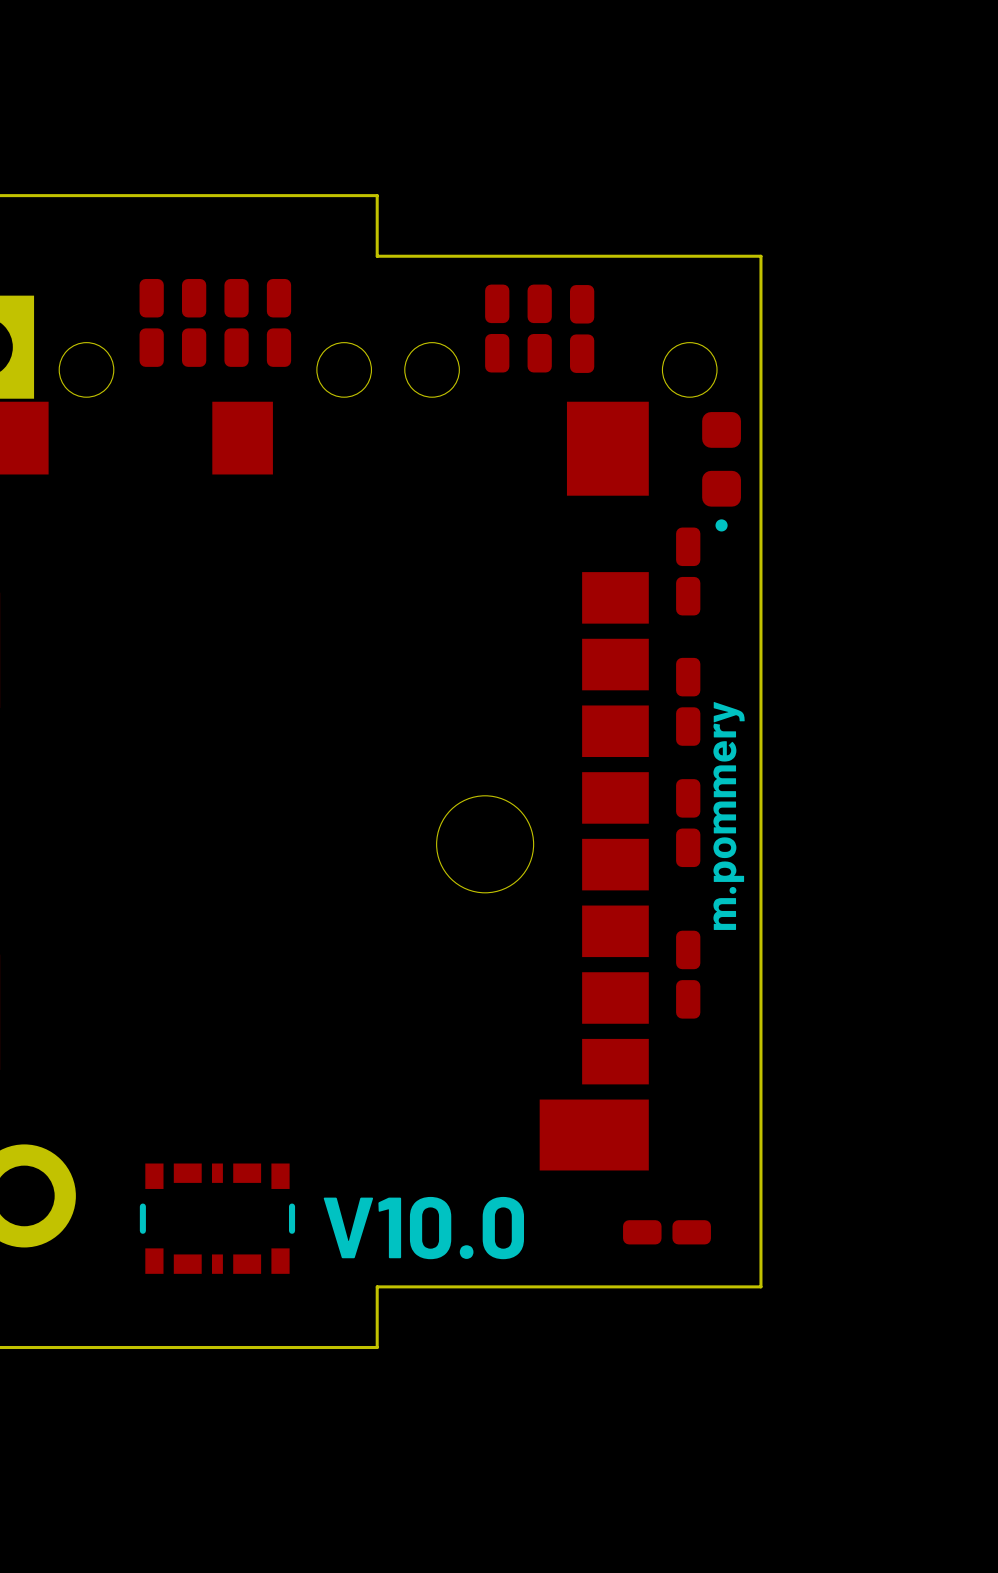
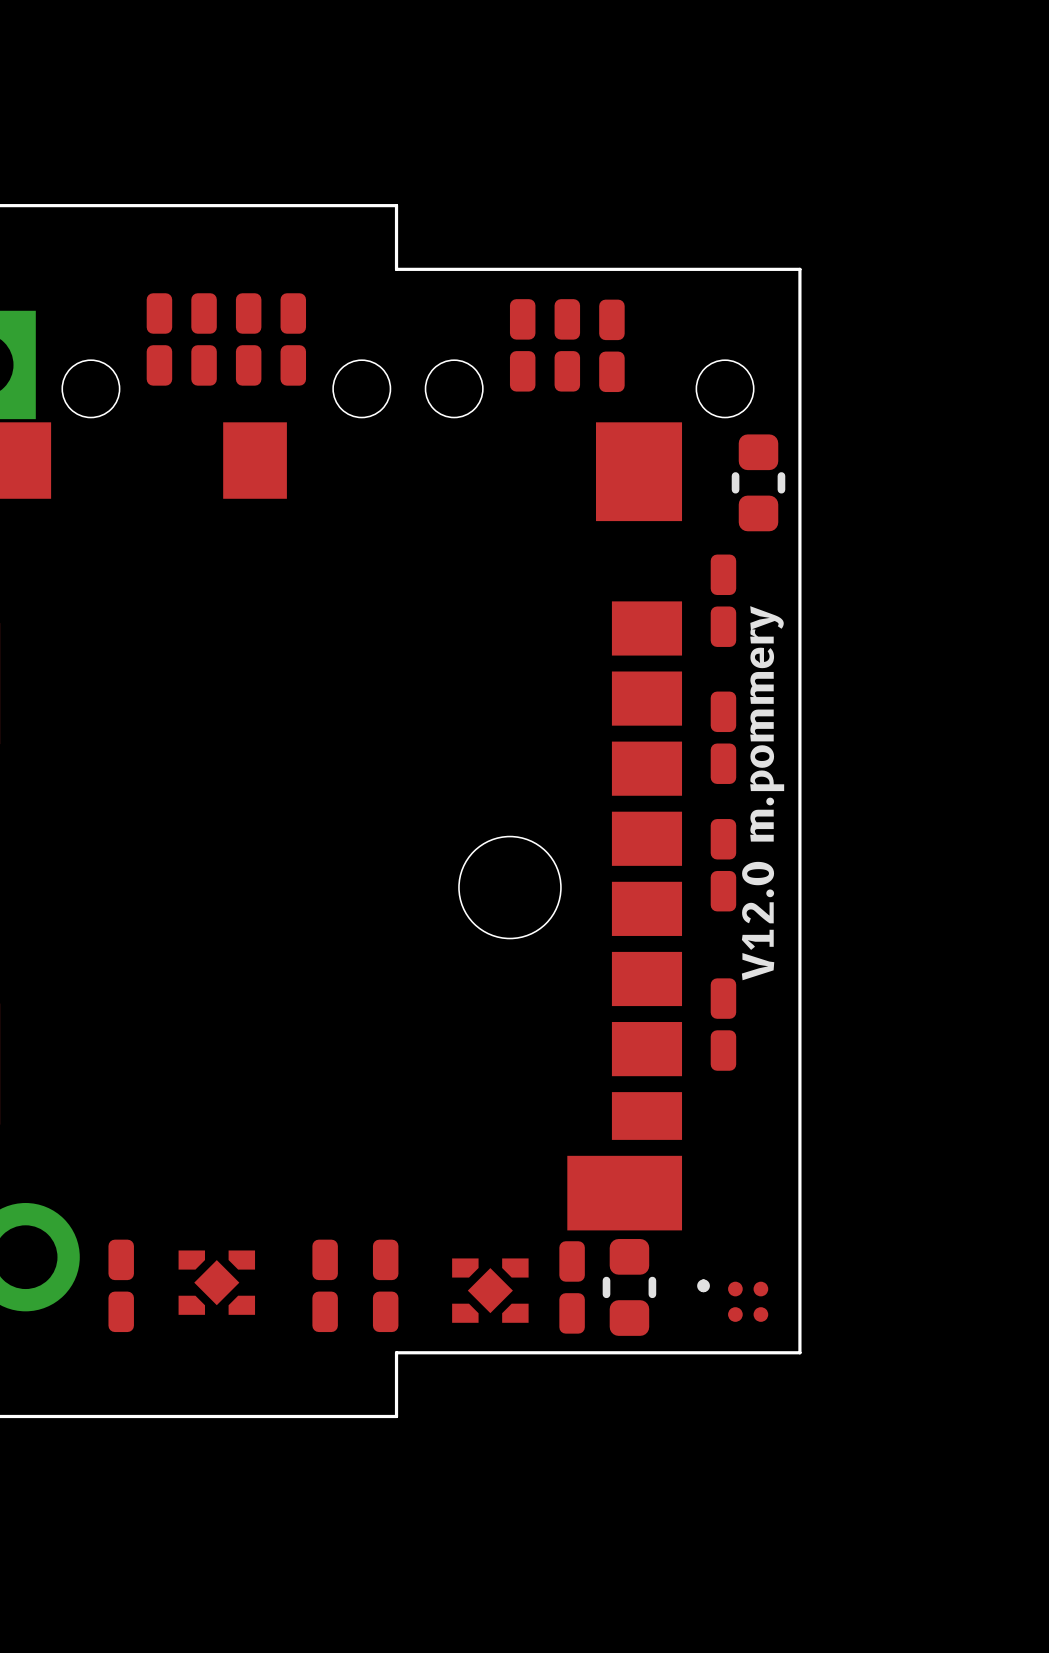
part footprint: [702, 412, 741, 532] -> [731, 434, 786, 532]
text: m.pommery (729, 815) -> V12.0 m.pommery (763, 793)
part footprint: [139, 1163, 296, 1274] -> [178, 1250, 256, 1315]
part footprint: [623, 1220, 711, 1245] -> [697, 1279, 769, 1322]
part: none -> (121, 1285)
part: none -> (325, 1285)
part: none -> (385, 1285)
part: none -> (572, 1287)
part: none -> (629, 1287)
part: none -> (490, 1290)
text: V10.0 (423, 1228) -> none

